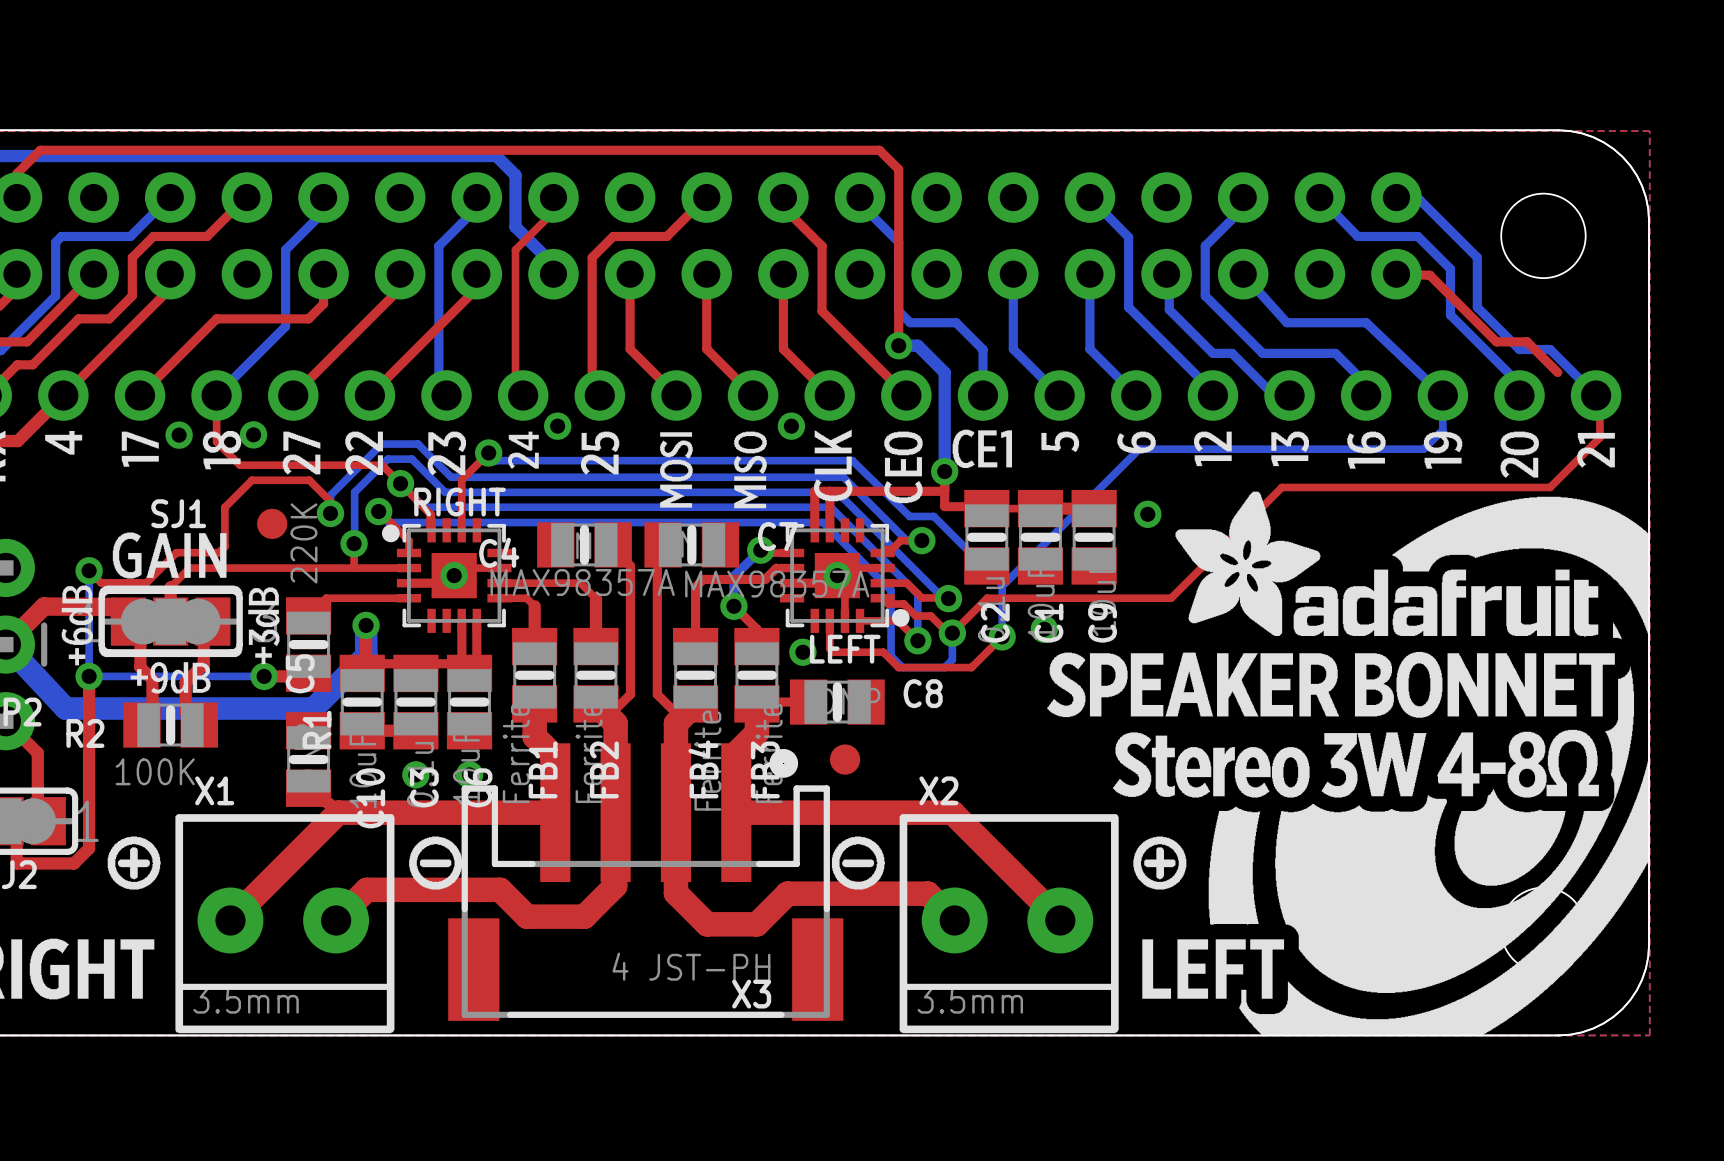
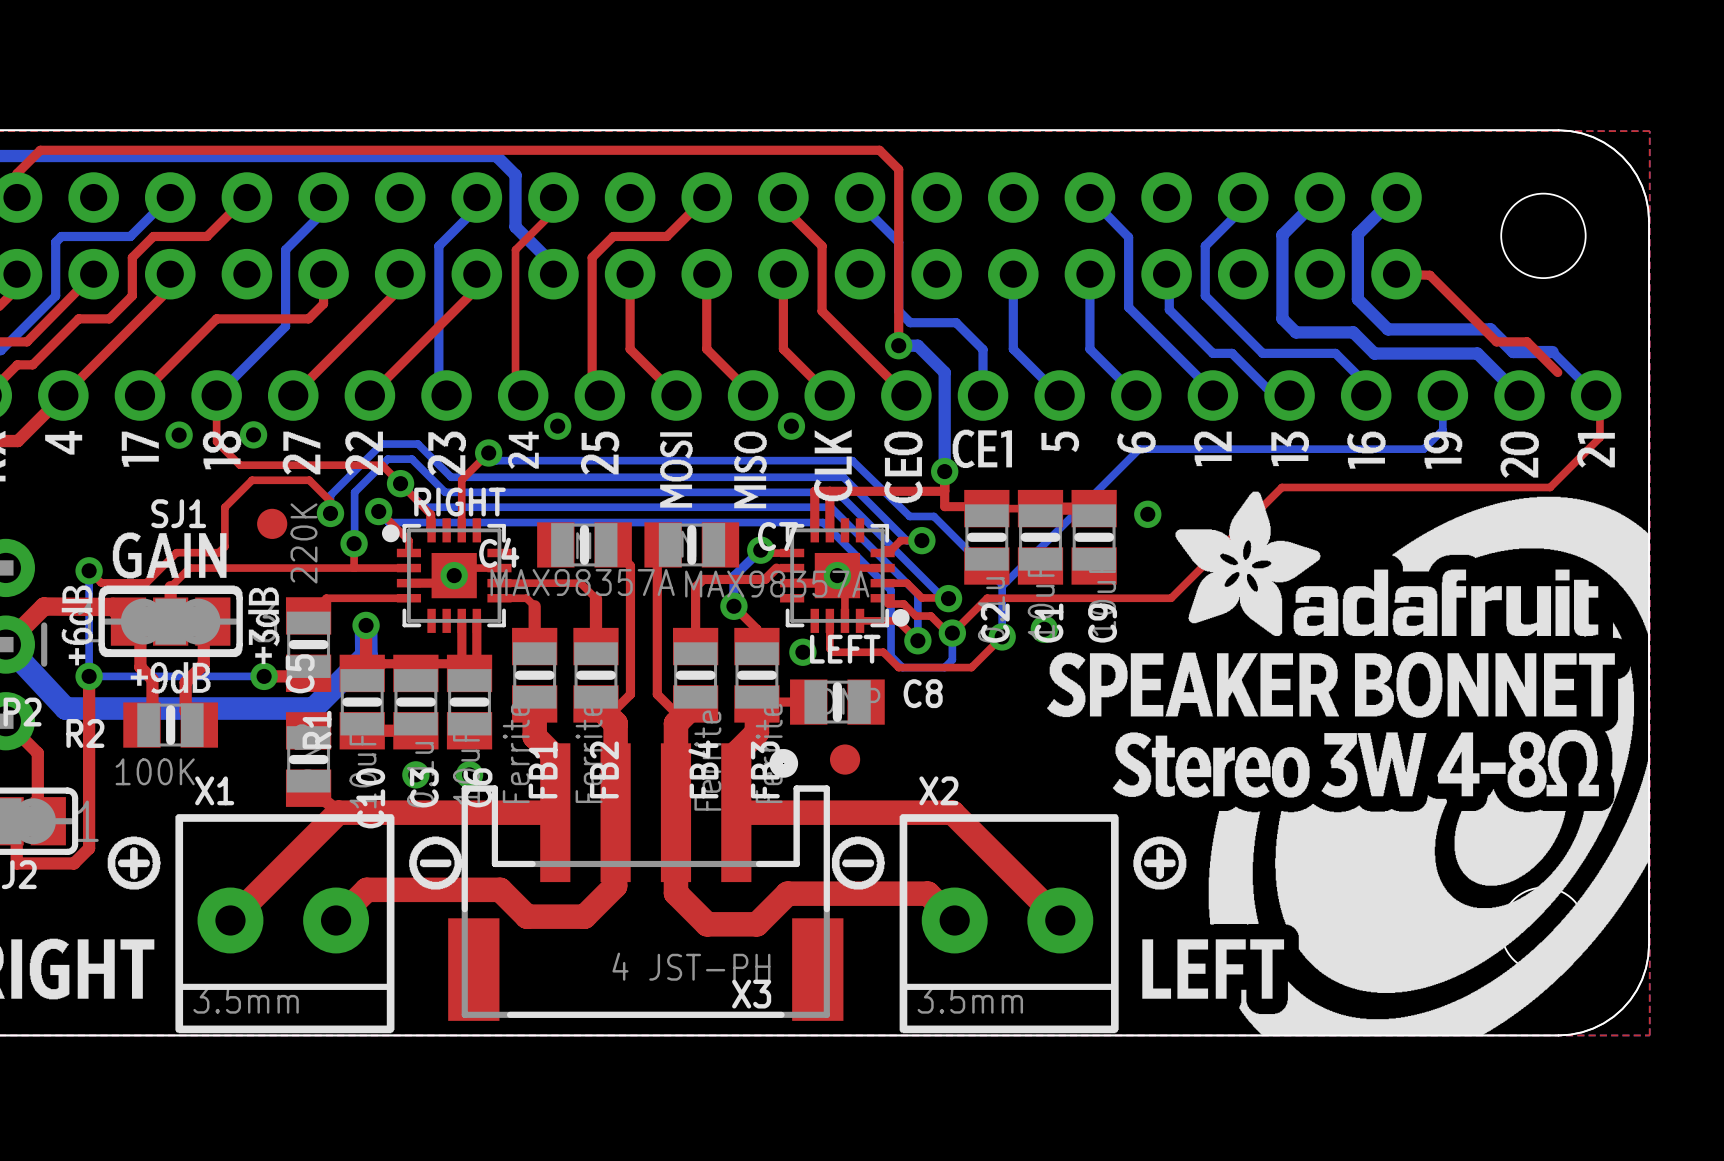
bottom track: (1319, 197) (1357, 236) (1417, 236) (1450, 269) (1450, 315) (1519, 384) (1519, 395) -> (1319, 197) (1282, 234) (1282, 318) (1296, 332) (1353, 332) (1374, 353) (1477, 353) (1519, 395)
bottom track: (1396, 197) (1397, 200) (1419, 200) (1477, 257) (1477, 307) (1519, 349) (1550, 349) (1552, 352) -> (1396, 197) (1357, 234) (1357, 299) (1388, 329) (1490, 329) (1513, 352) (1552, 352)
bottom track: (1243, 274) (1286, 322) (1366, 322) (1442, 395) -> none

